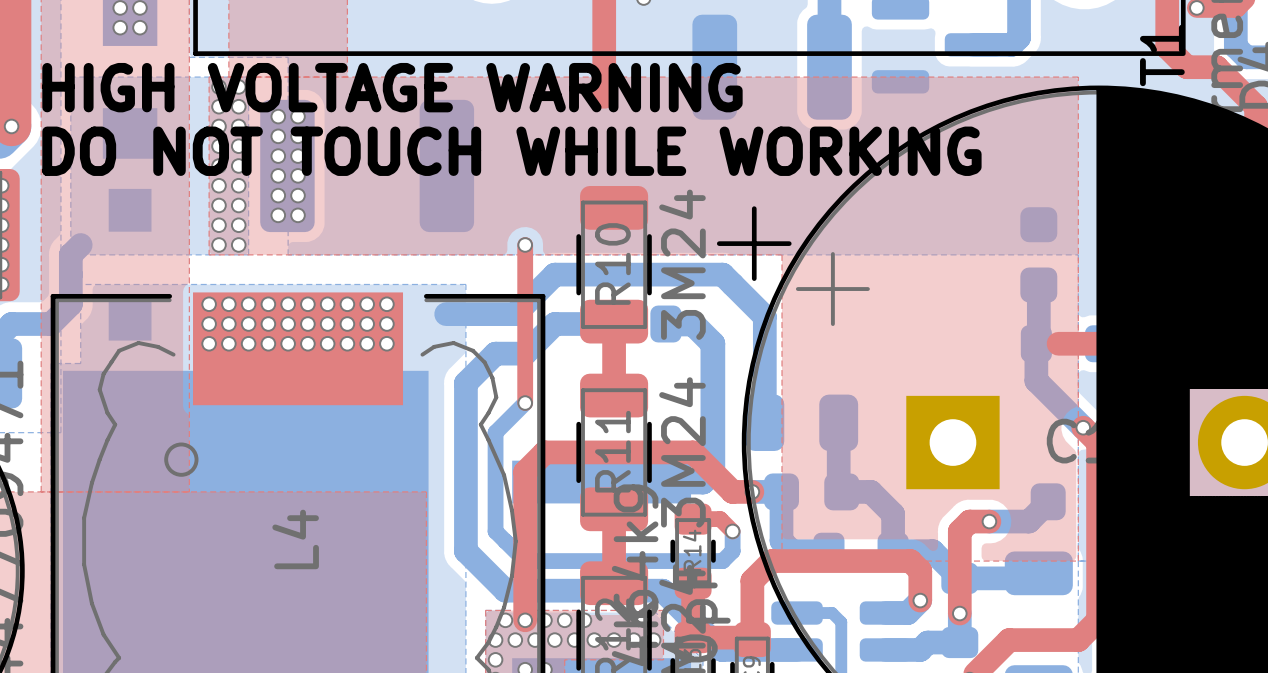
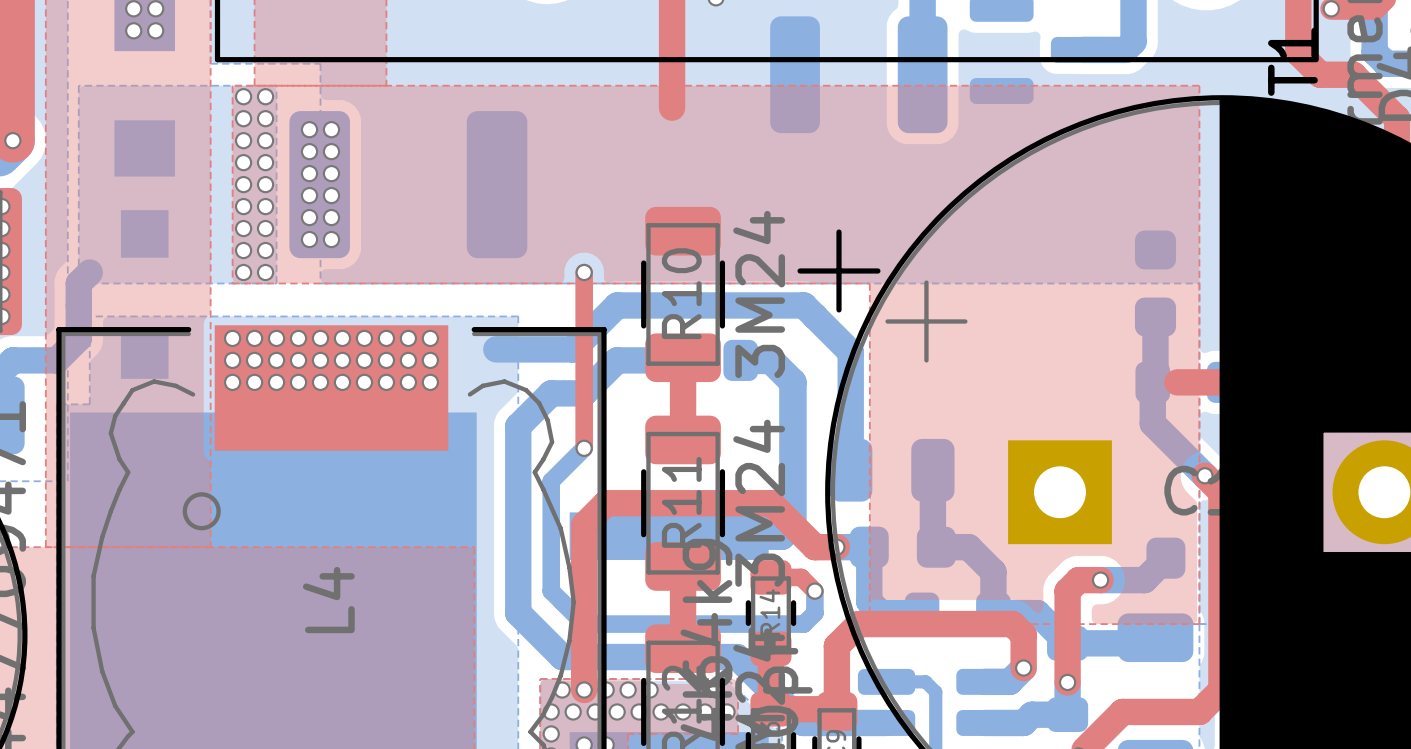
text: HIGH VOLTAGE WARNING (392, 87) -> none
text: DO NOT TOUCH WHILE WORKING (511, 151) -> none

